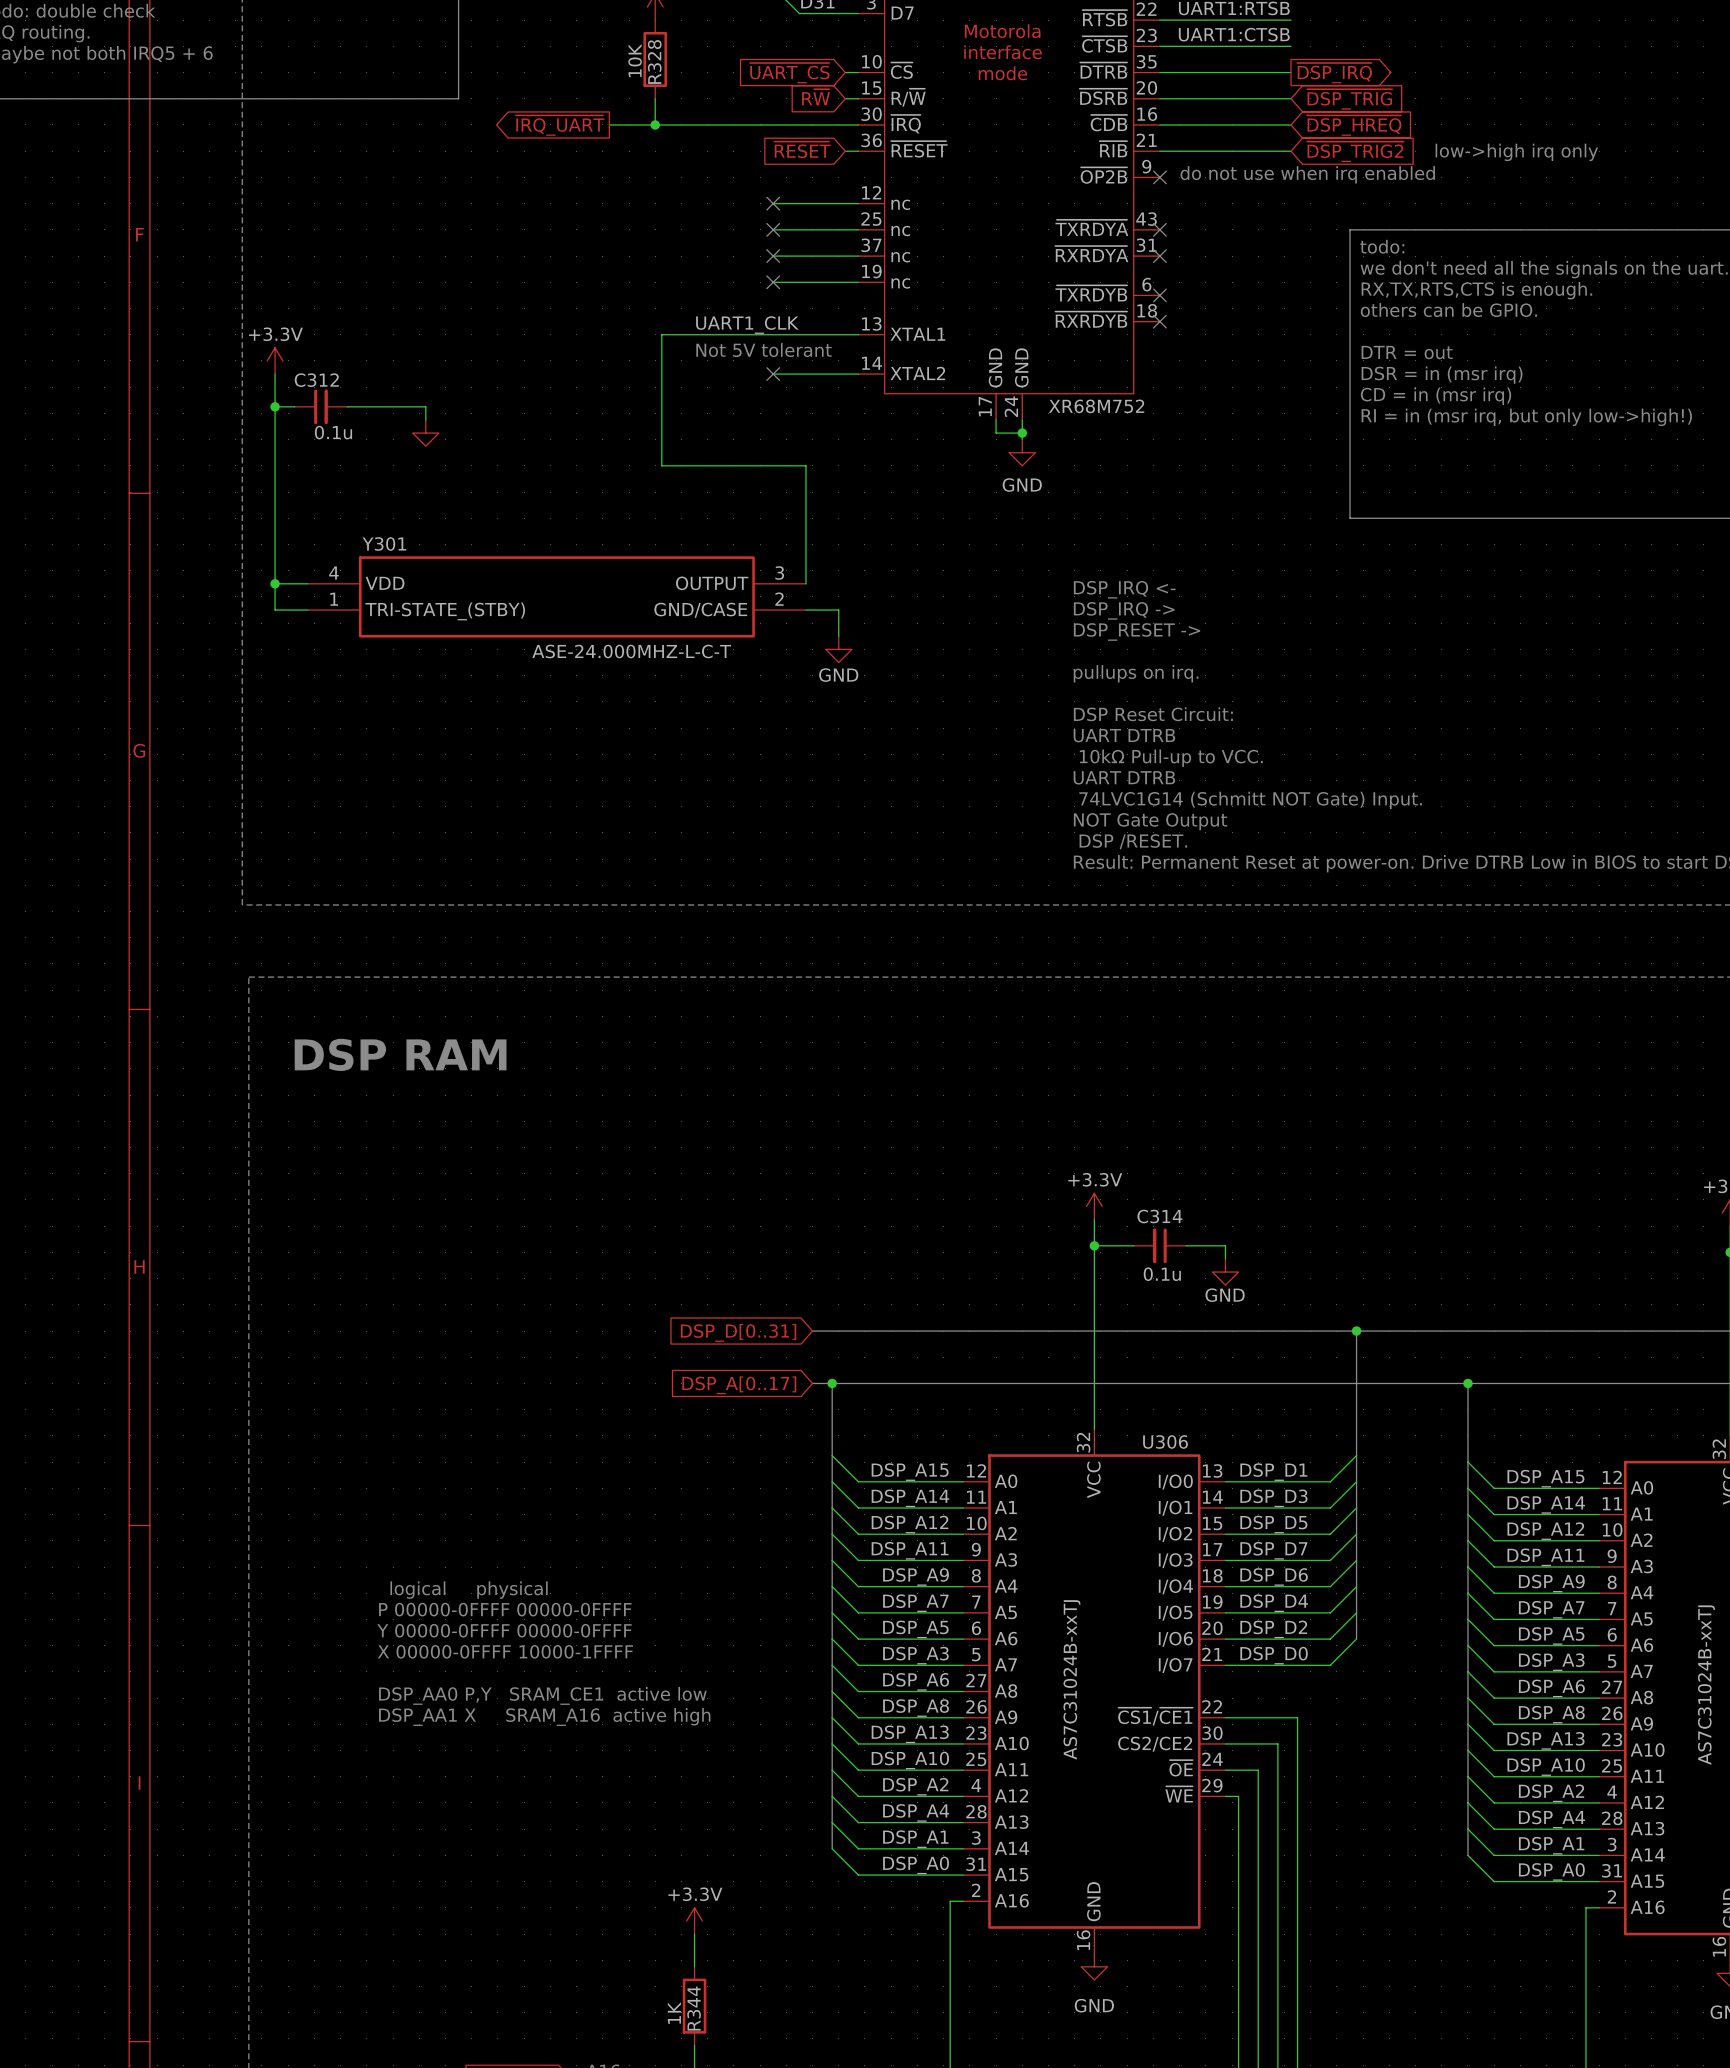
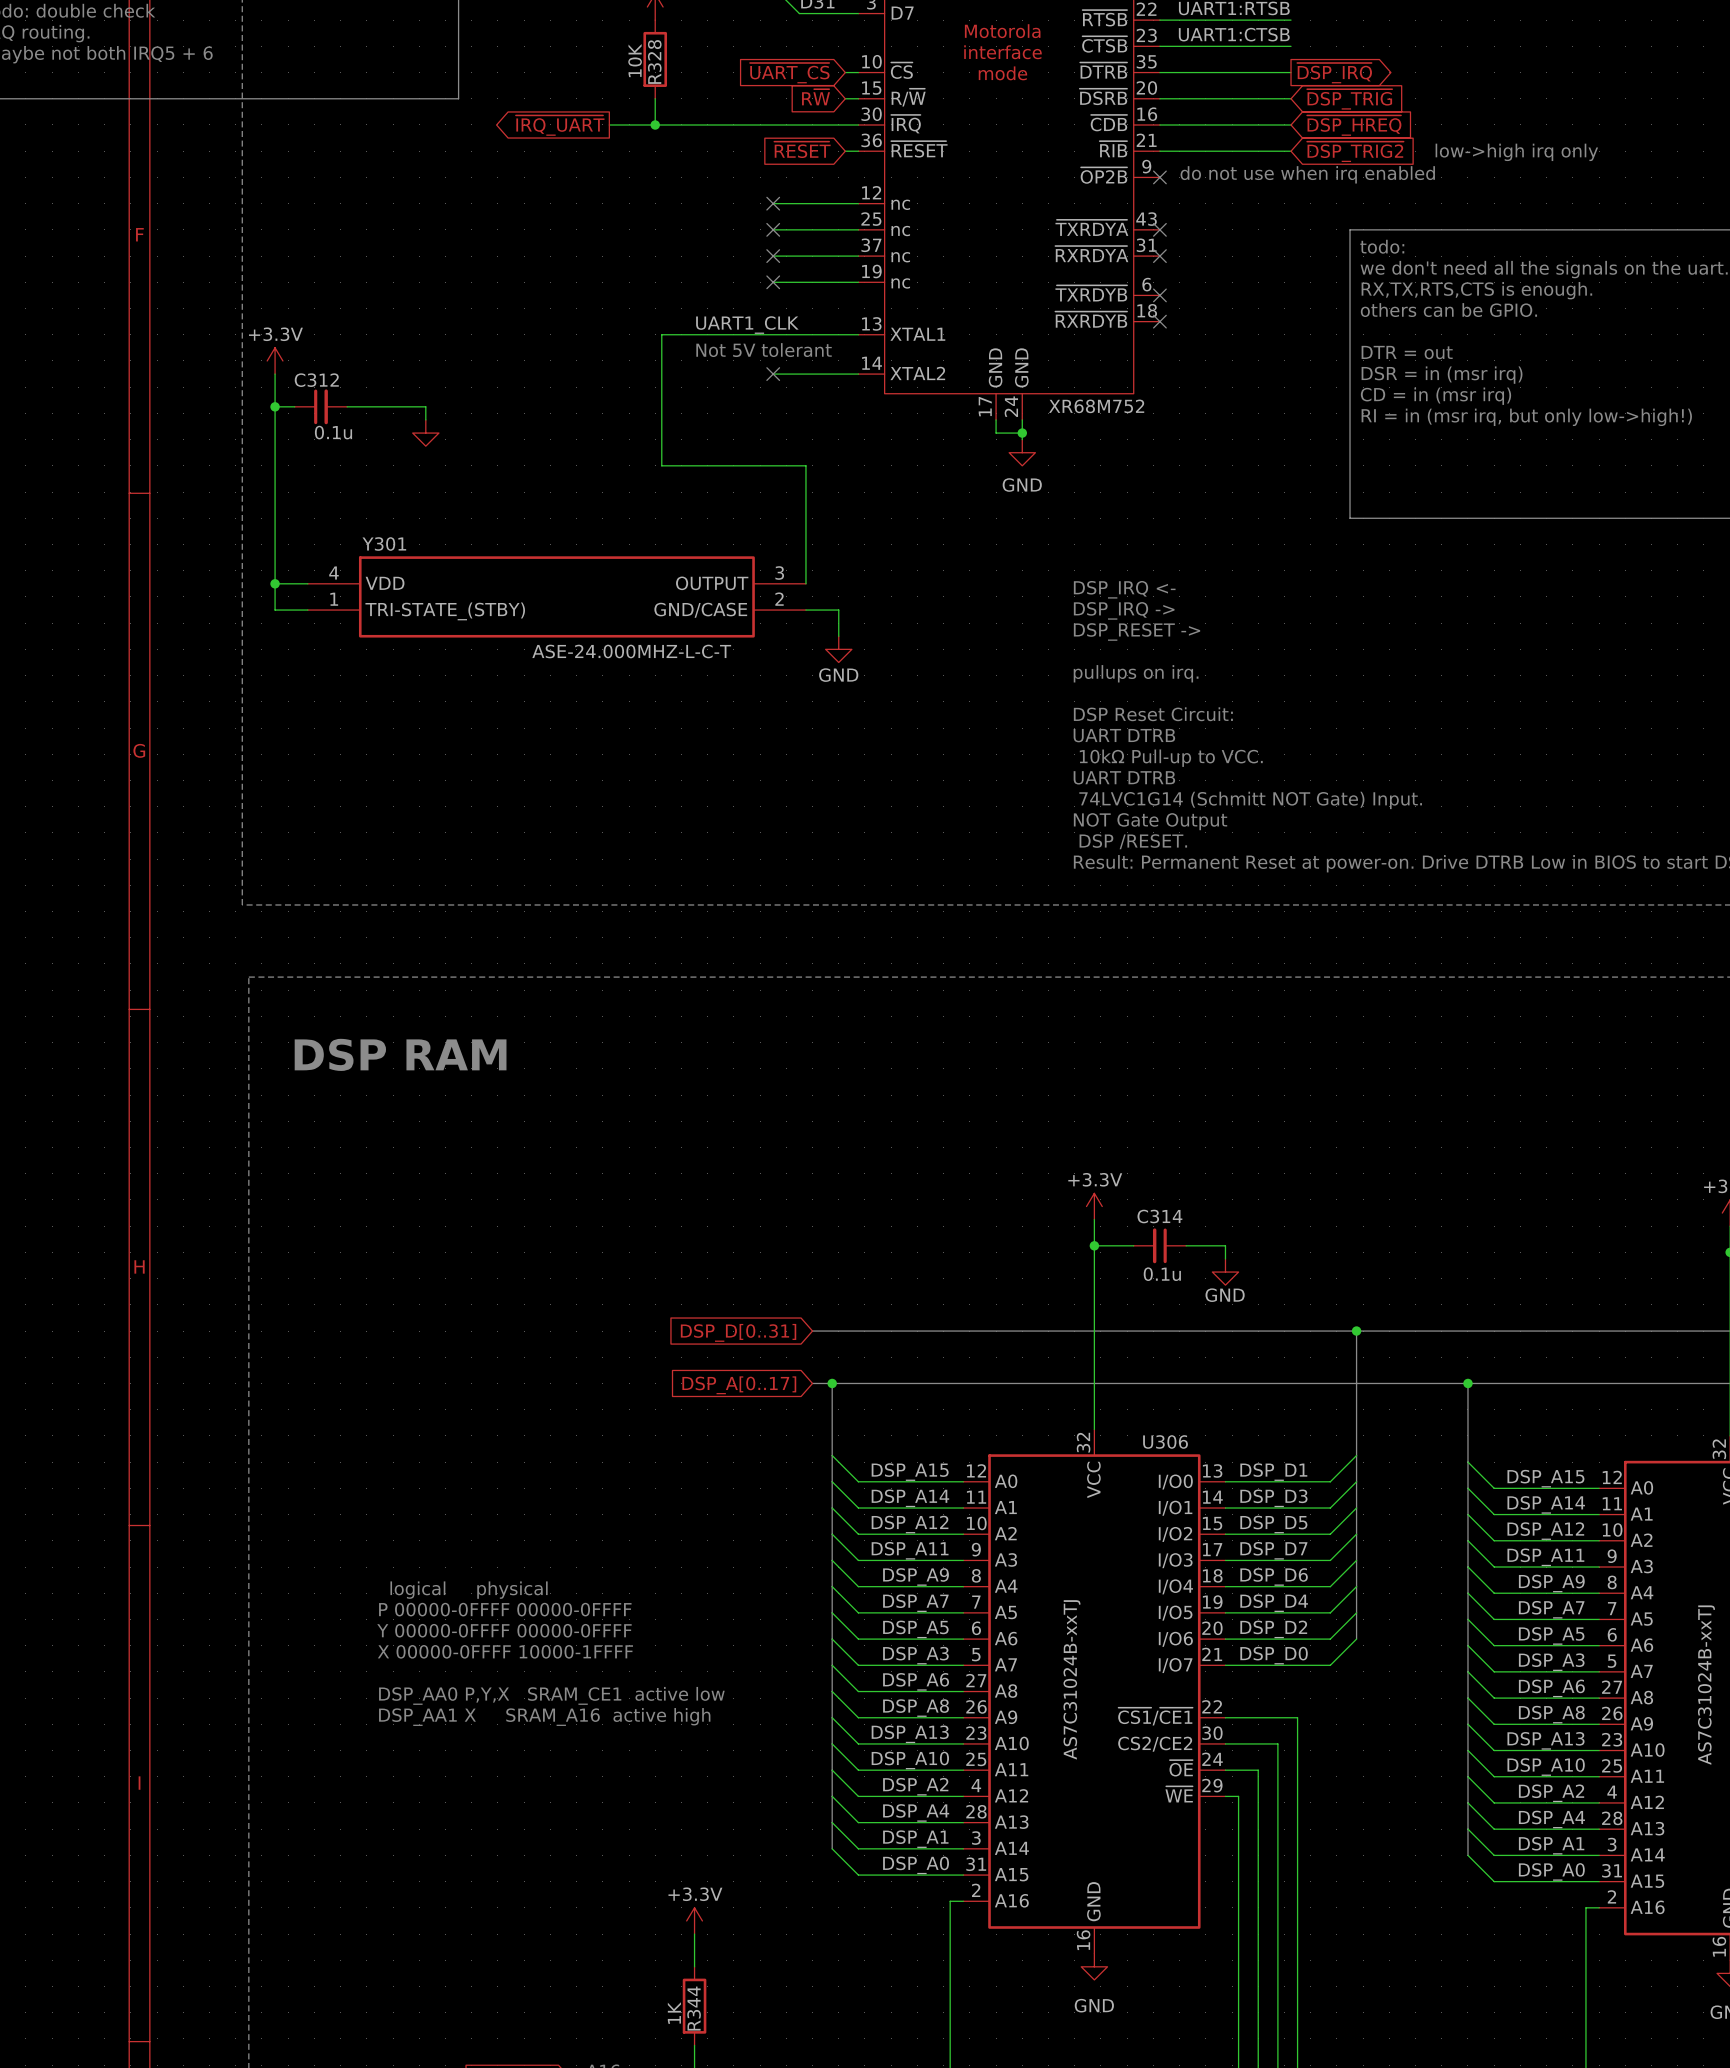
text: DSP_AA0 P,Y SRAM_CE1 active low (542, 1695) -> DSP_AA0 P,Y,X SRAM_CE1 active low (551, 1695)

